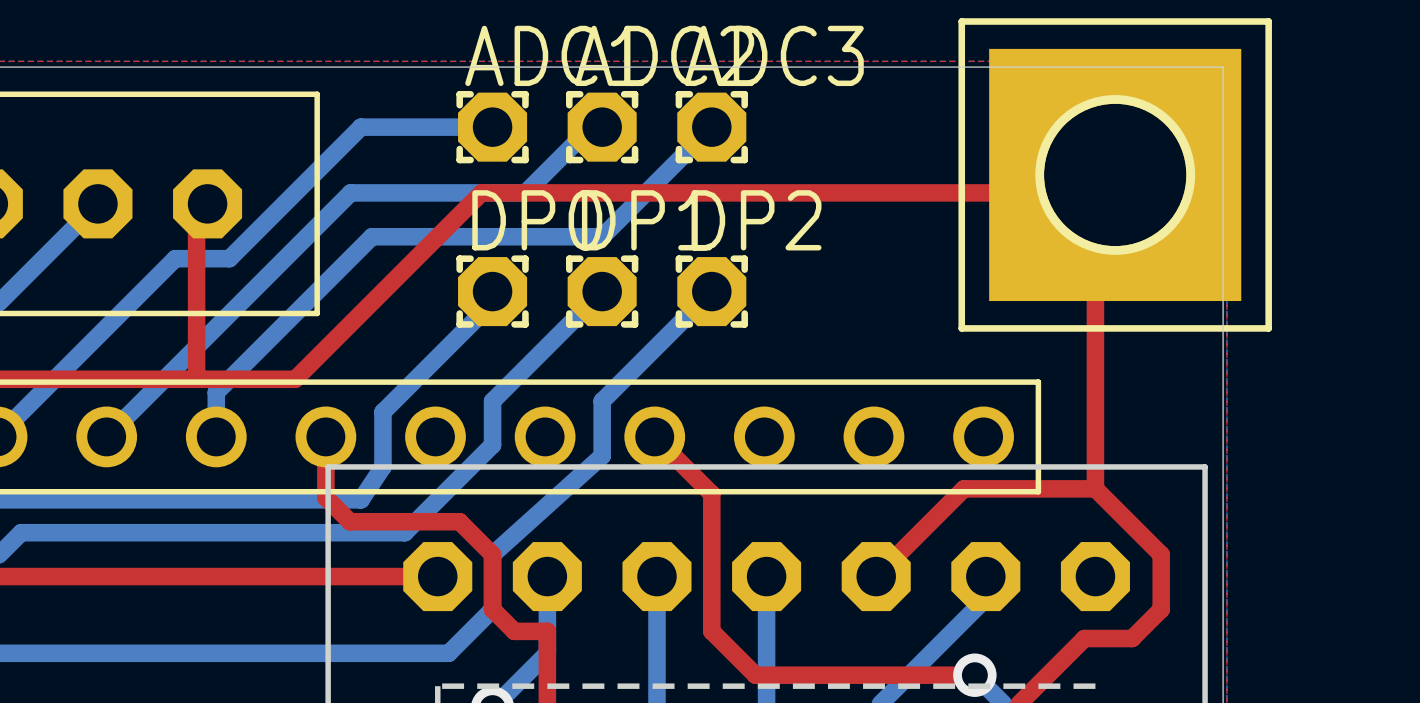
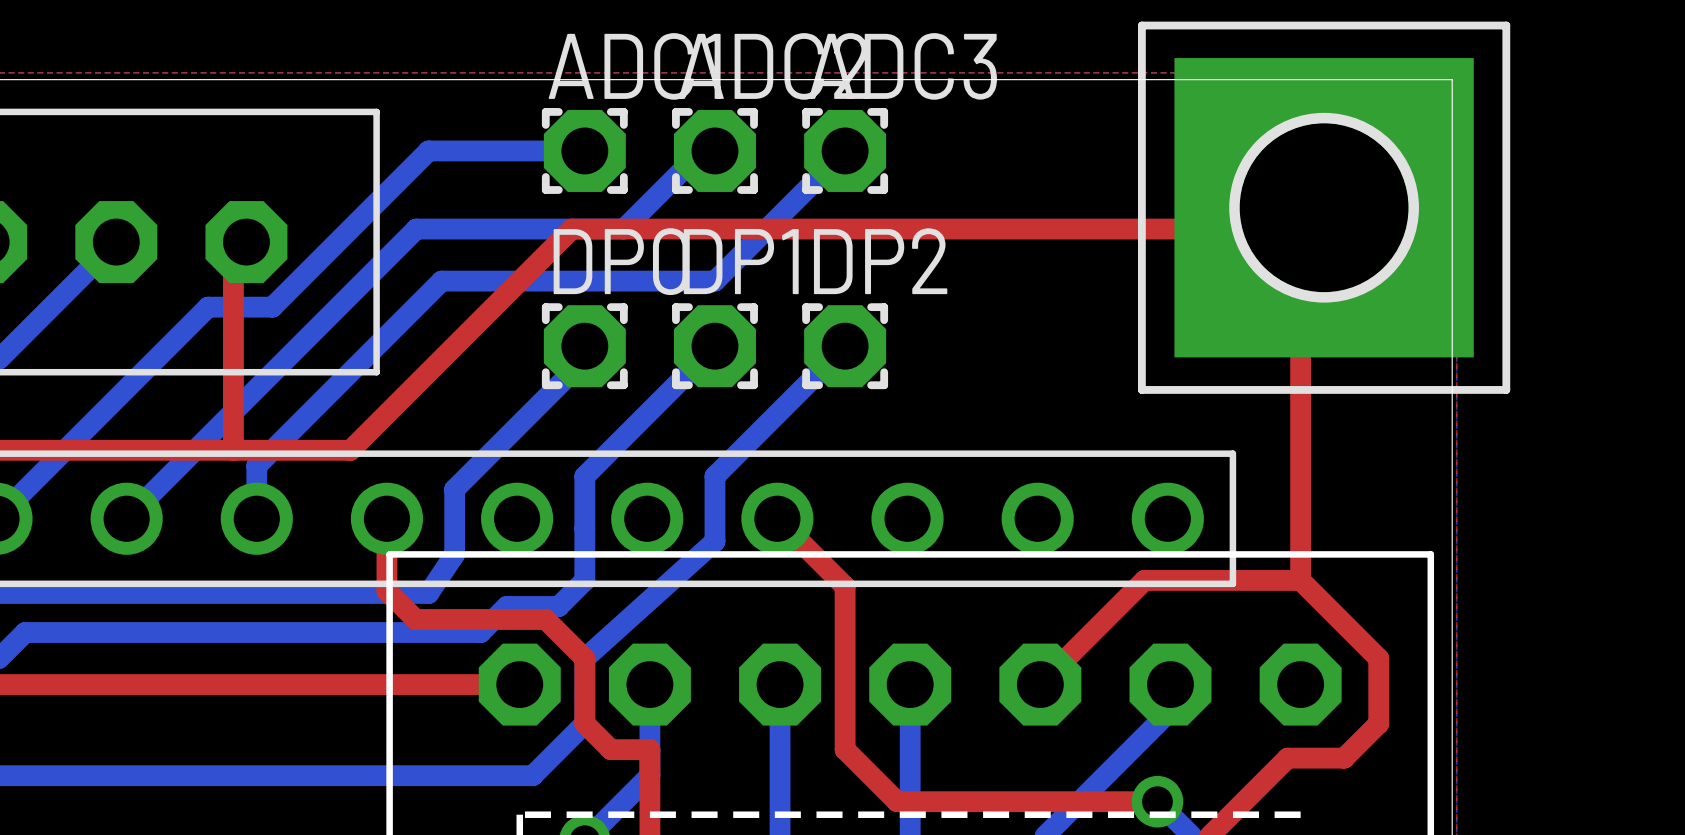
bottom track: (492, 445) (426, 510) -> (584, 528) (584, 580) (558, 606) (506, 606)

